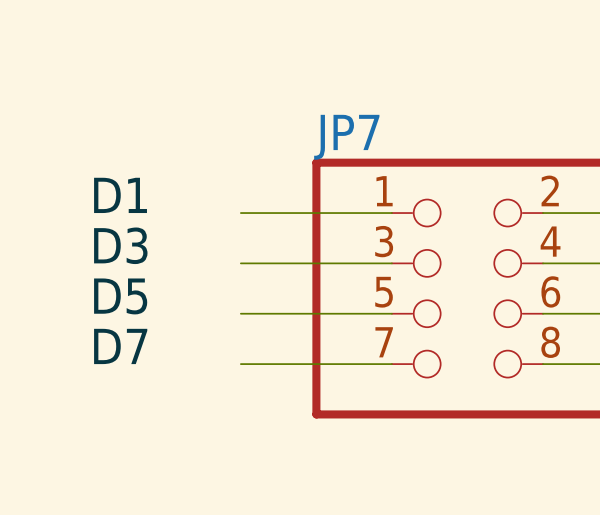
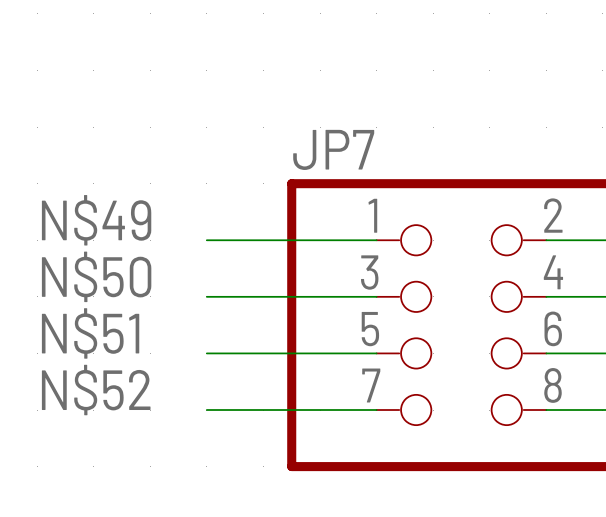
label: D1 (120, 195) -> N$49 (96, 220)
label: D3 (120, 245) -> N$50 (96, 276)
label: D5 (120, 296) -> N$51 (90, 333)
label: D7 (120, 346) -> N$52 (96, 390)

